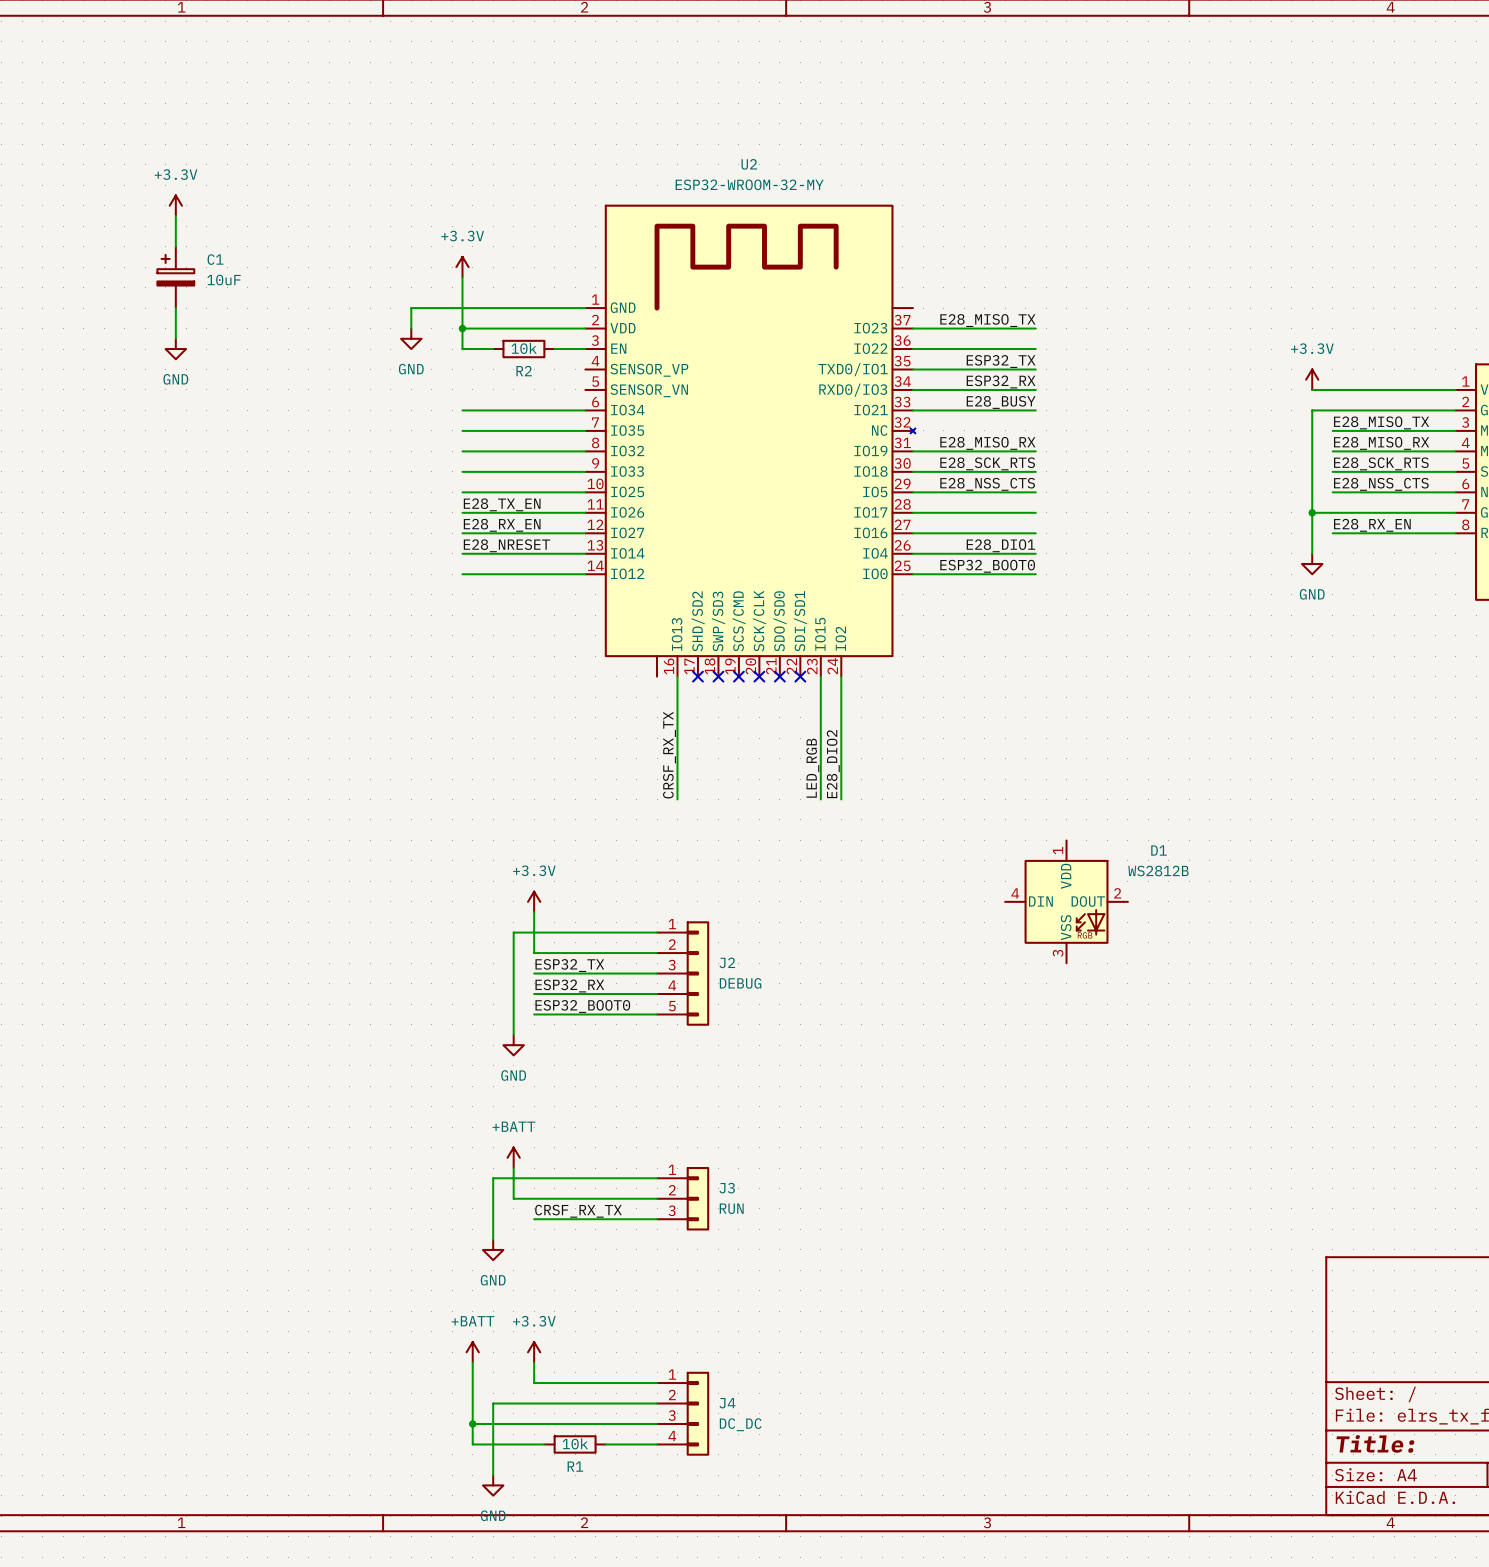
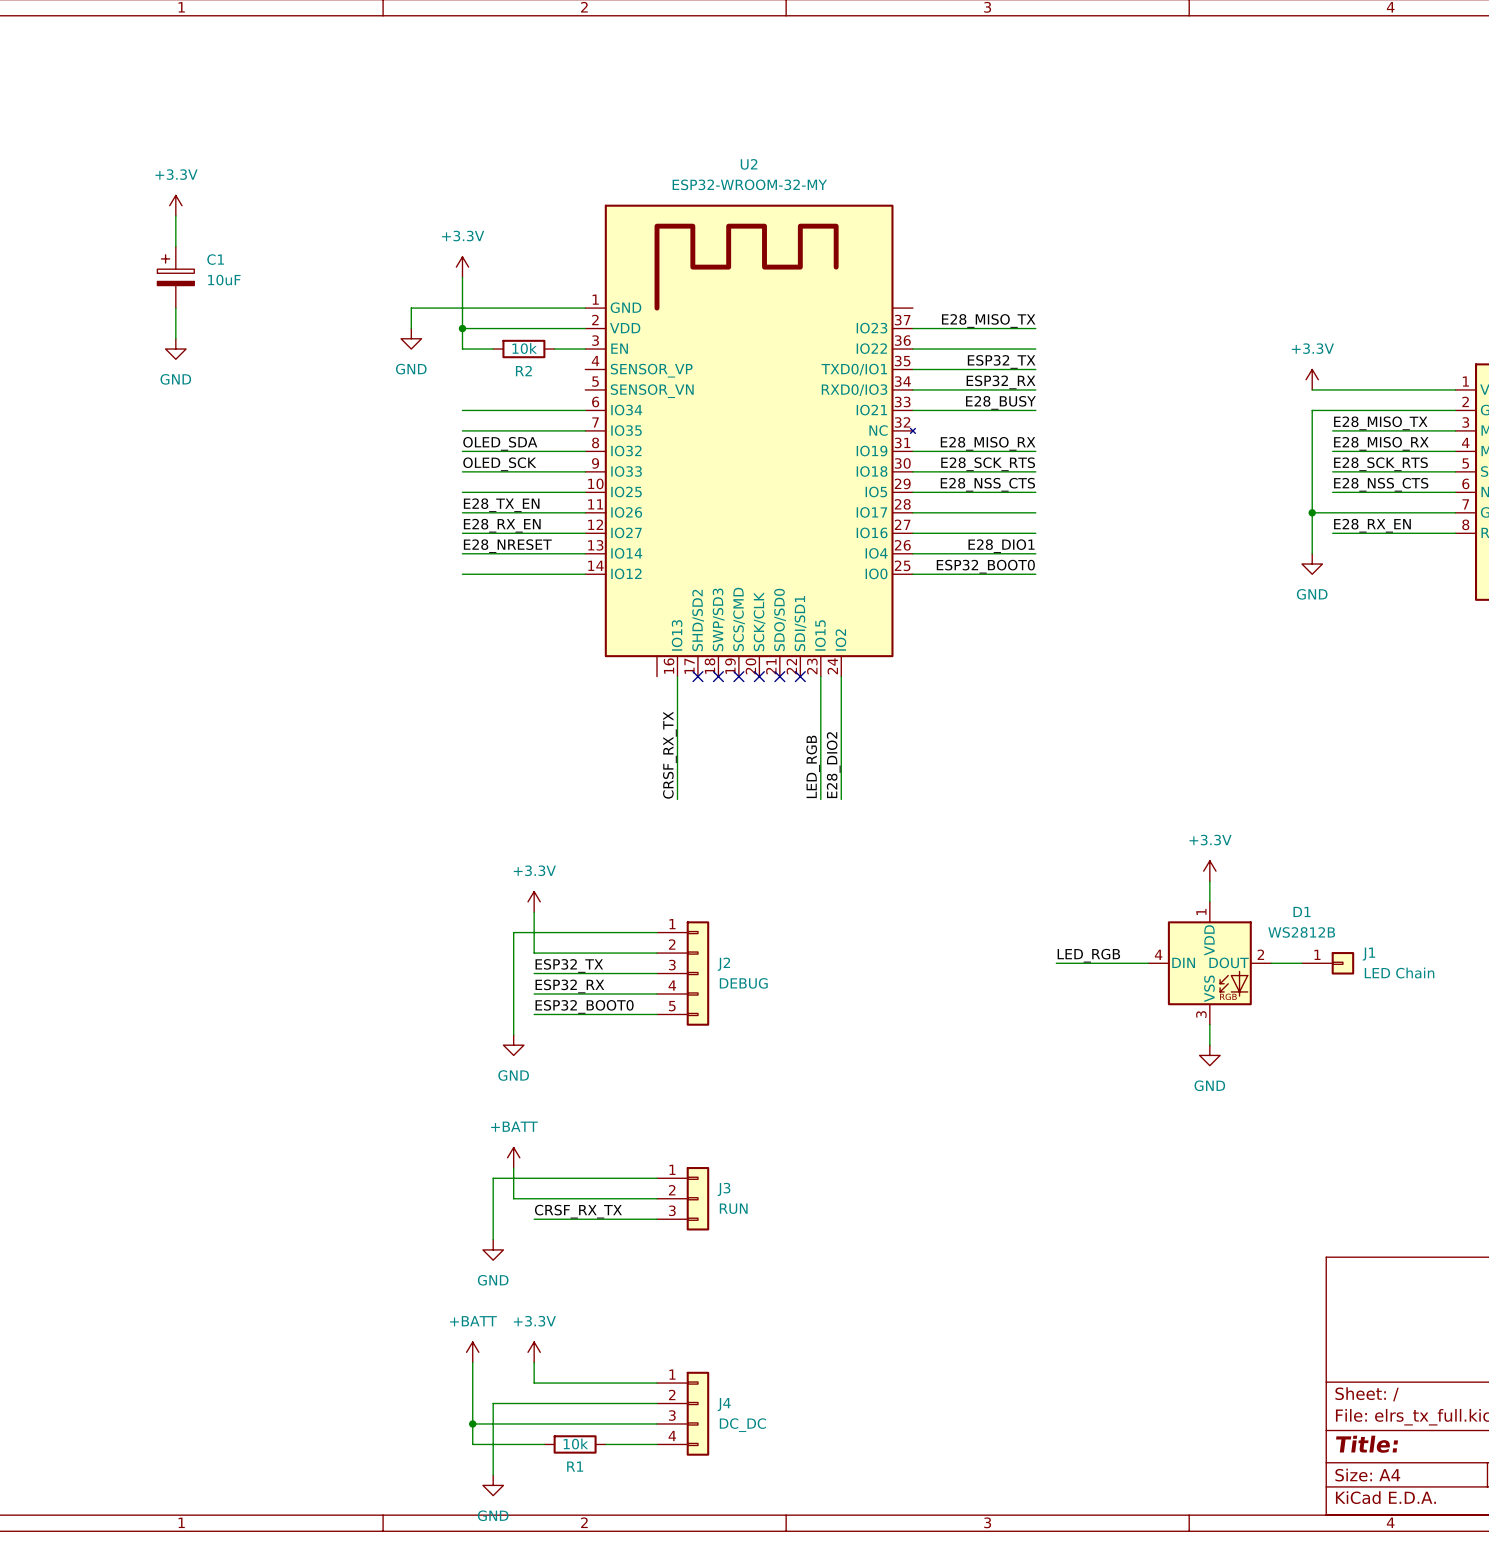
label: none -> OLED_SDA (500, 443)
label: none -> OLED_SCK (499, 464)
power symbol: none -> +3.3V (1209, 871)
wire: none -> (1209, 881) (1209, 901)
D1 position: (1066, 901) -> (1209, 963)
label: none -> LED_RGB (1088, 955)
wire: none -> (1056, 963) (1148, 963)
wire: none -> (1271, 963) (1301, 963)
J1: none -> LED Chain (1328, 963)
wire: none -> (1209, 1024) (1209, 1045)
power symbol: none -> GND (1209, 1055)

